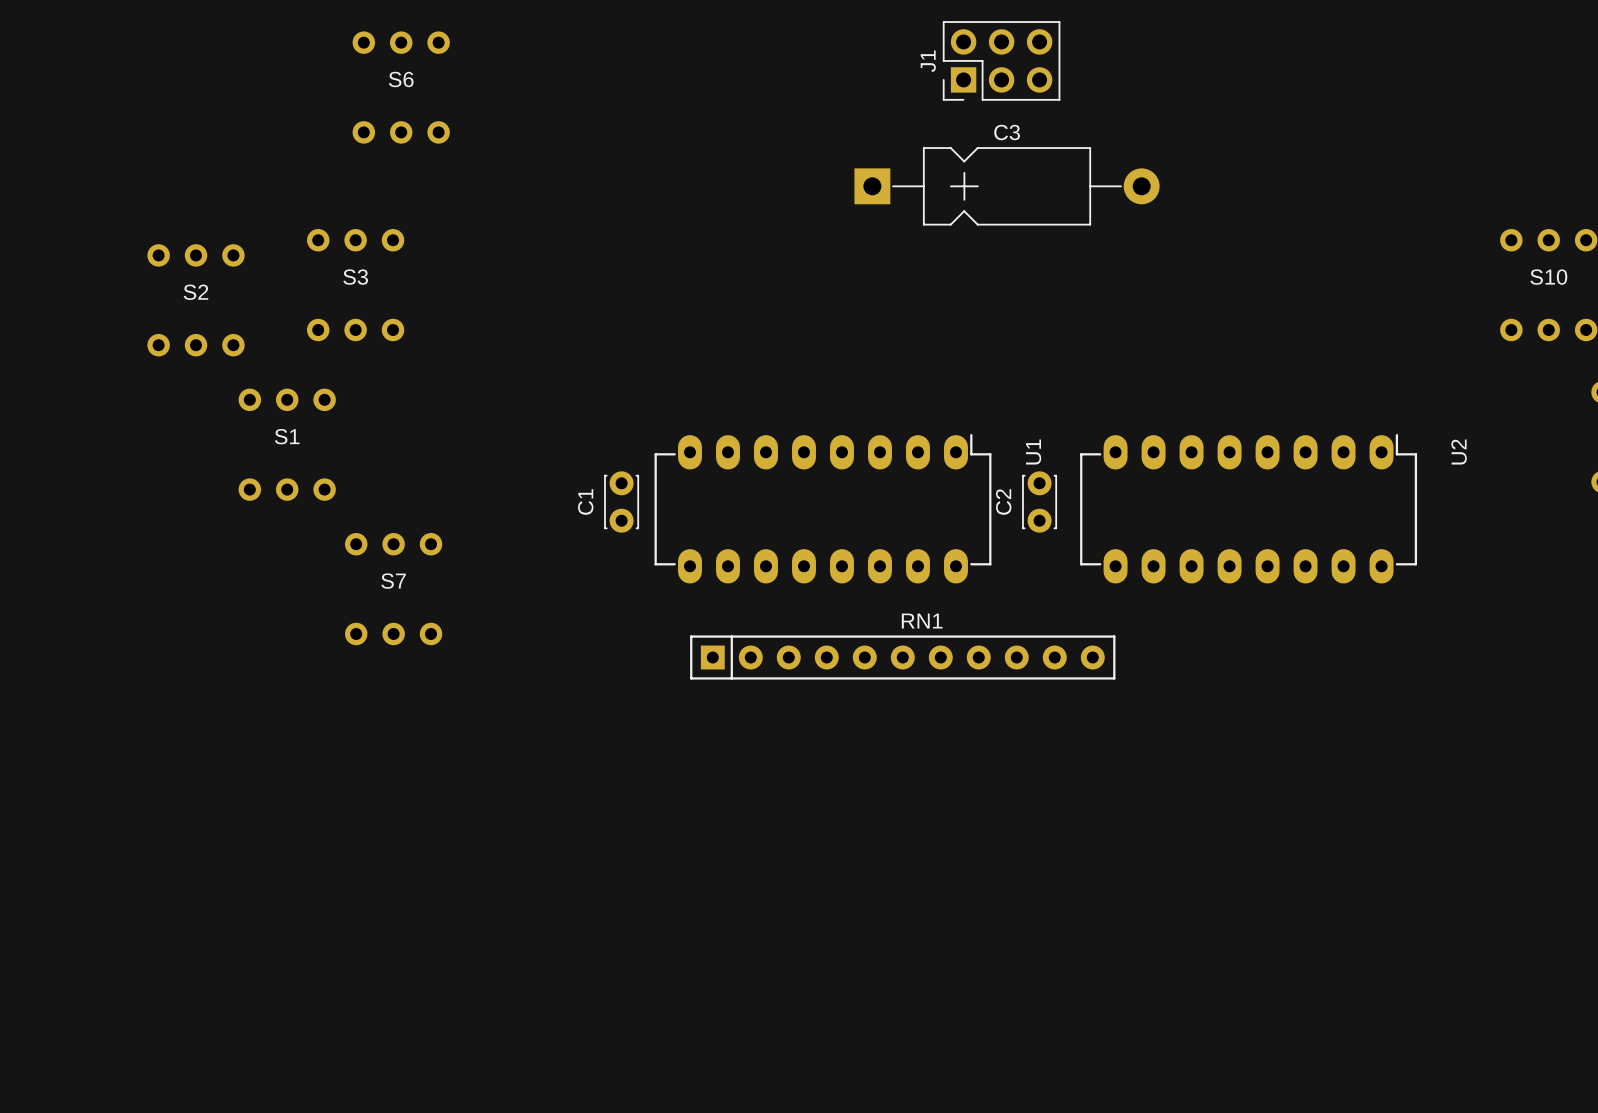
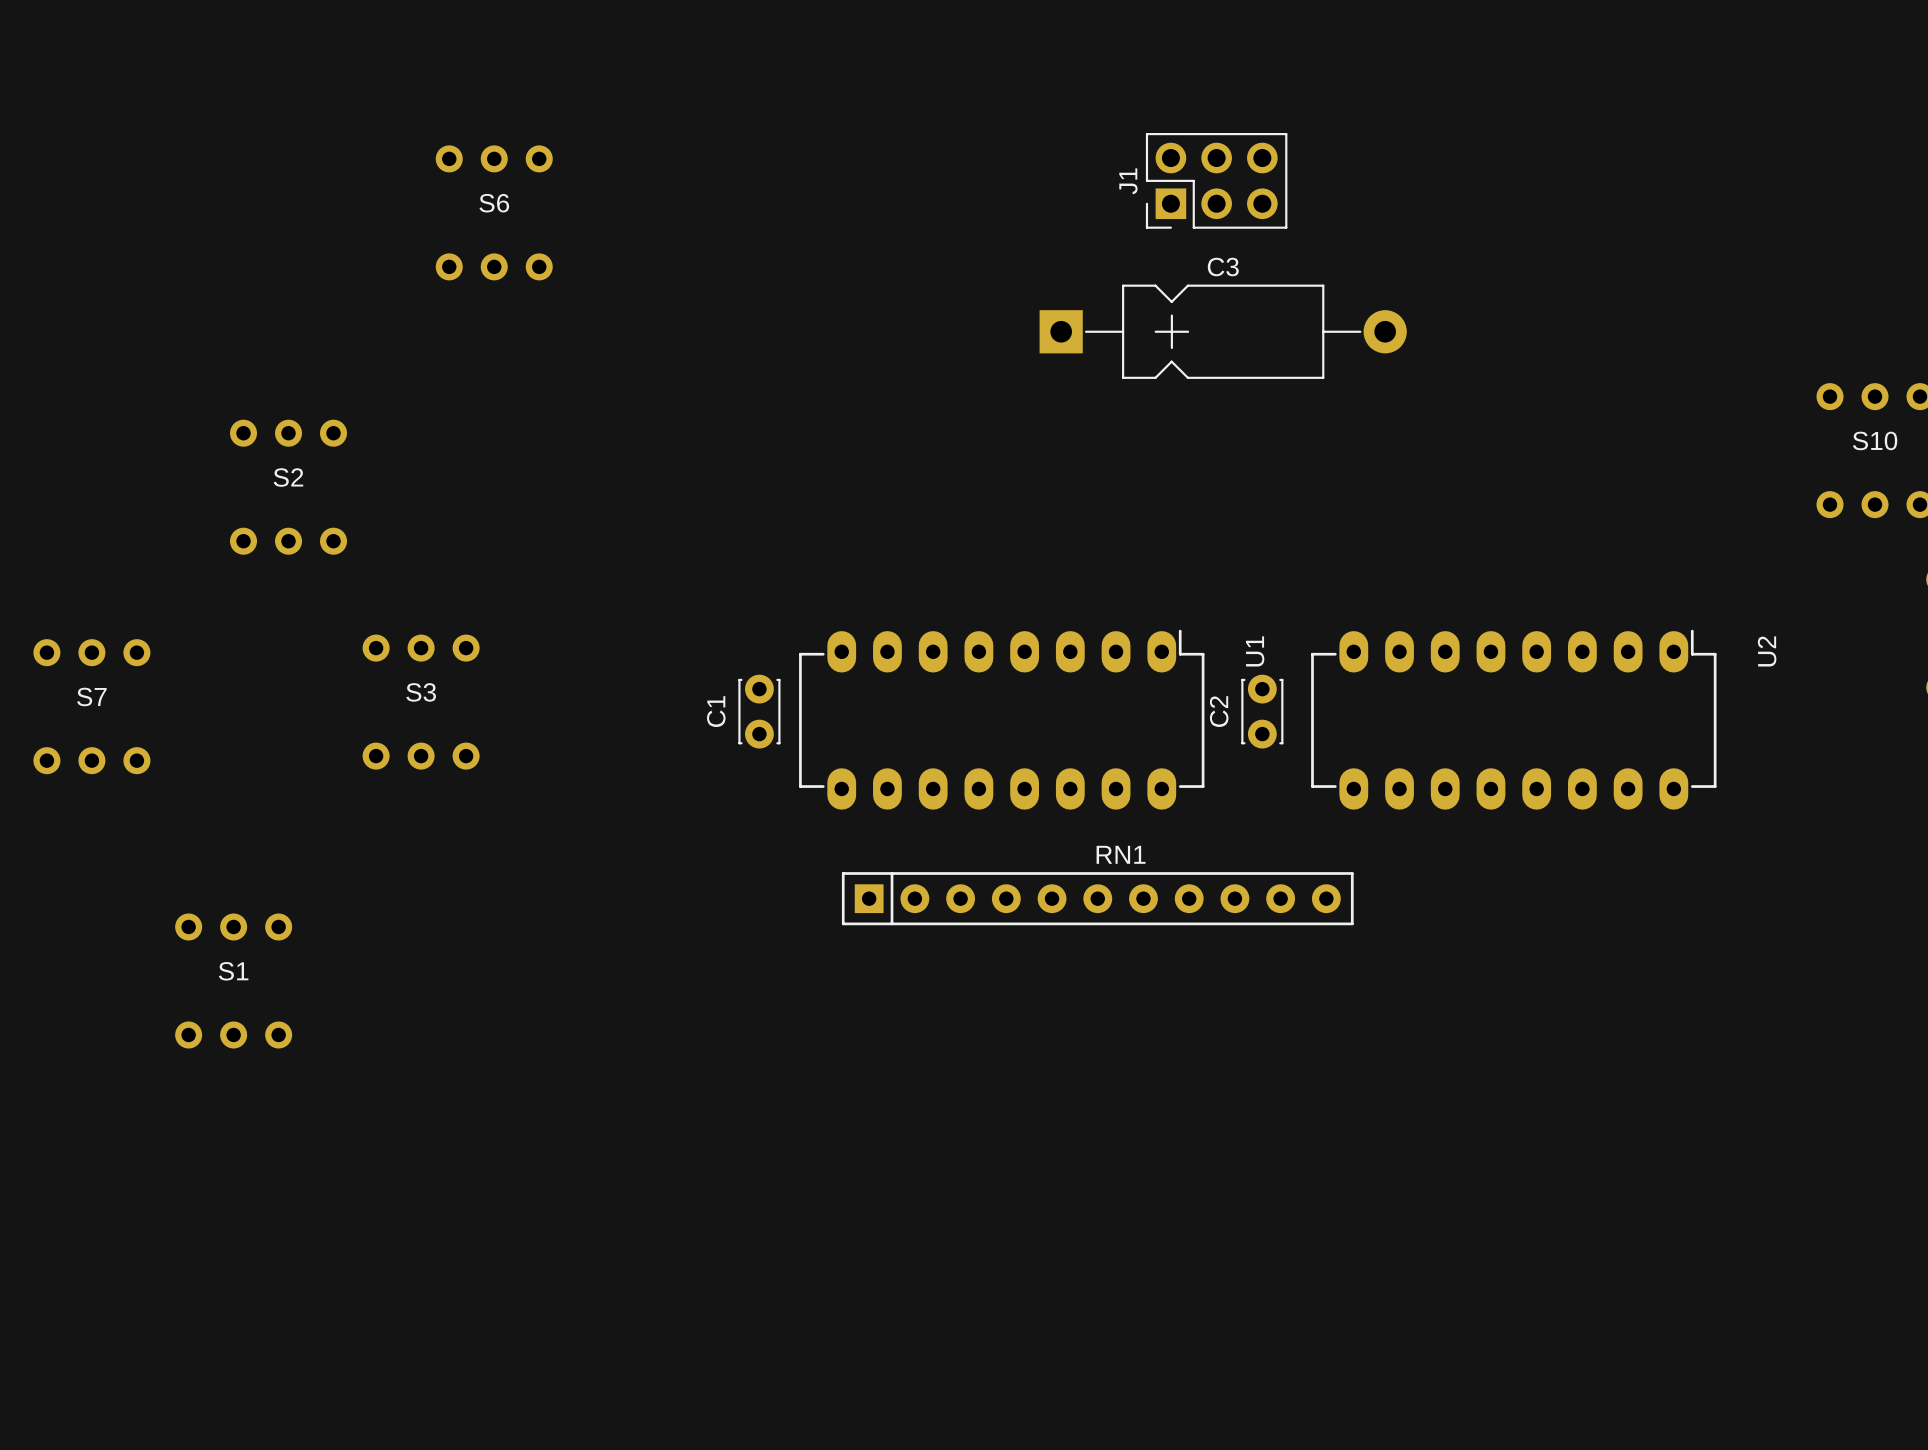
S3 position: (355, 285) -> (421, 702)
S2 position: (196, 300) -> (288, 487)
S1 position: (287, 444) -> (233, 980)
S7 position: (393, 589) -> (91, 706)

